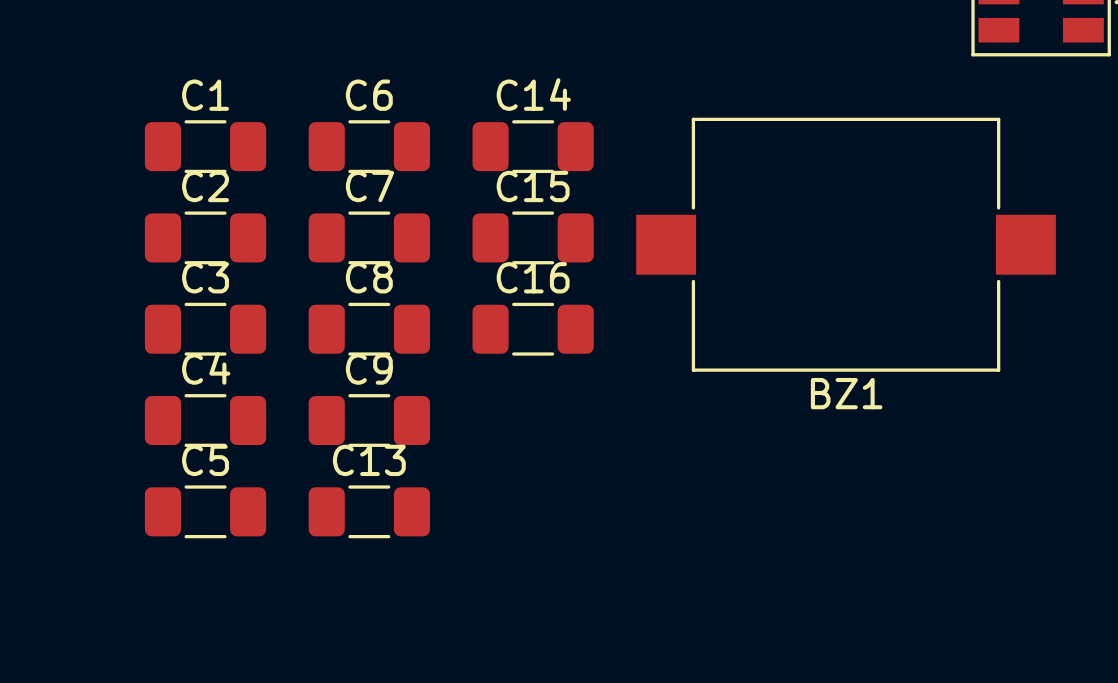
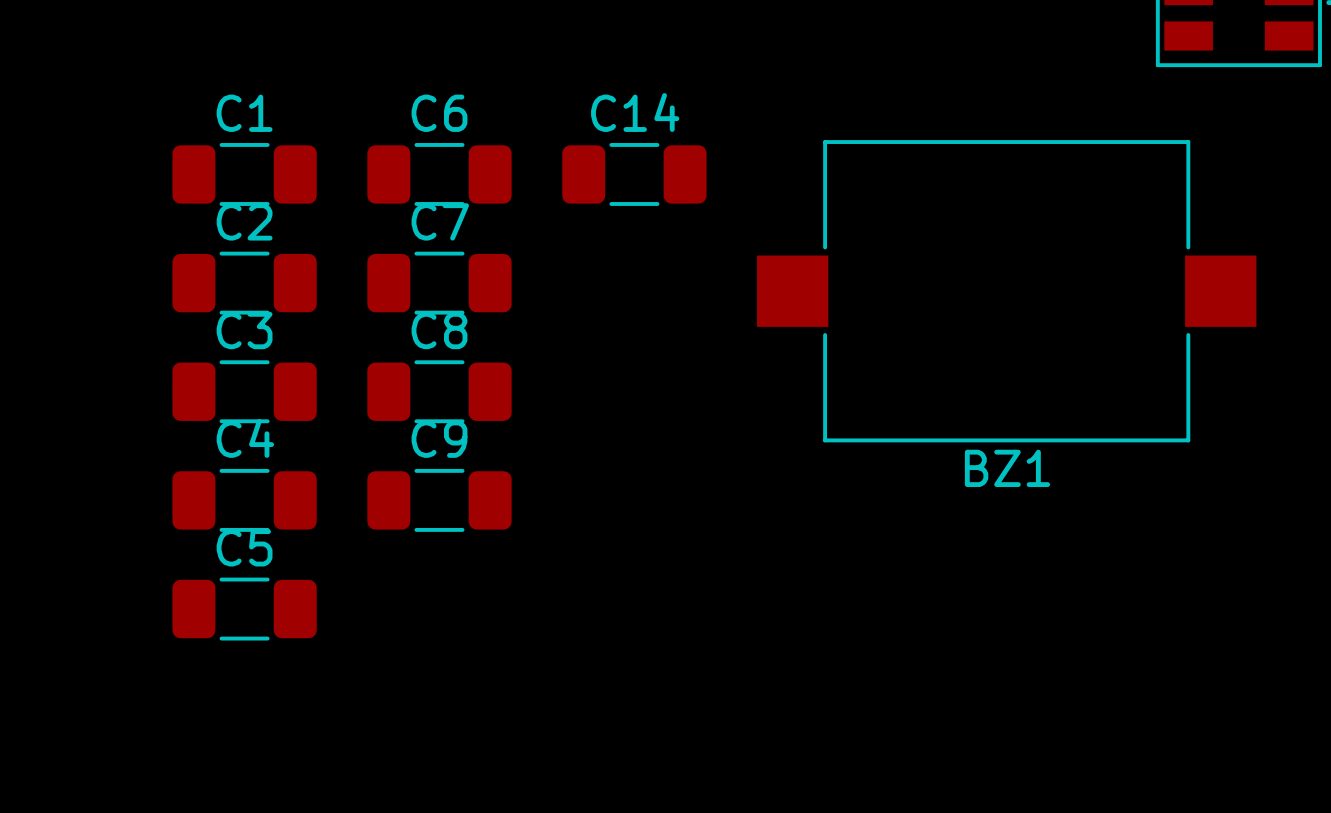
C15: (533, 237) -> none
C16: (533, 329) -> none
C13: (369, 511) -> none

